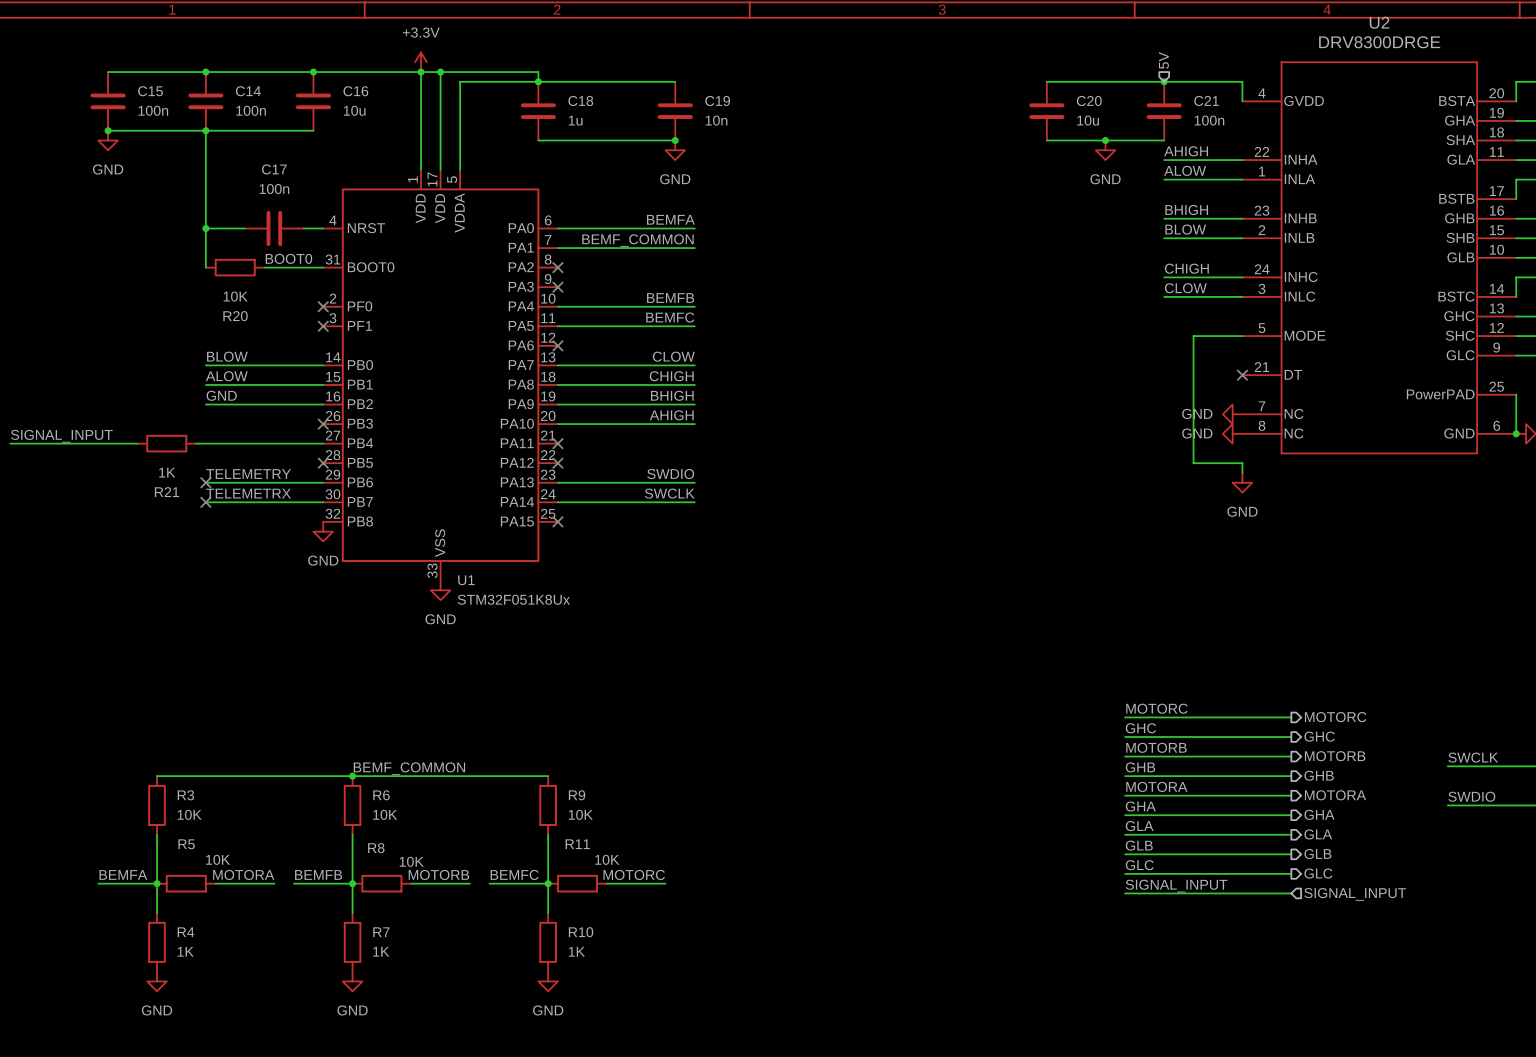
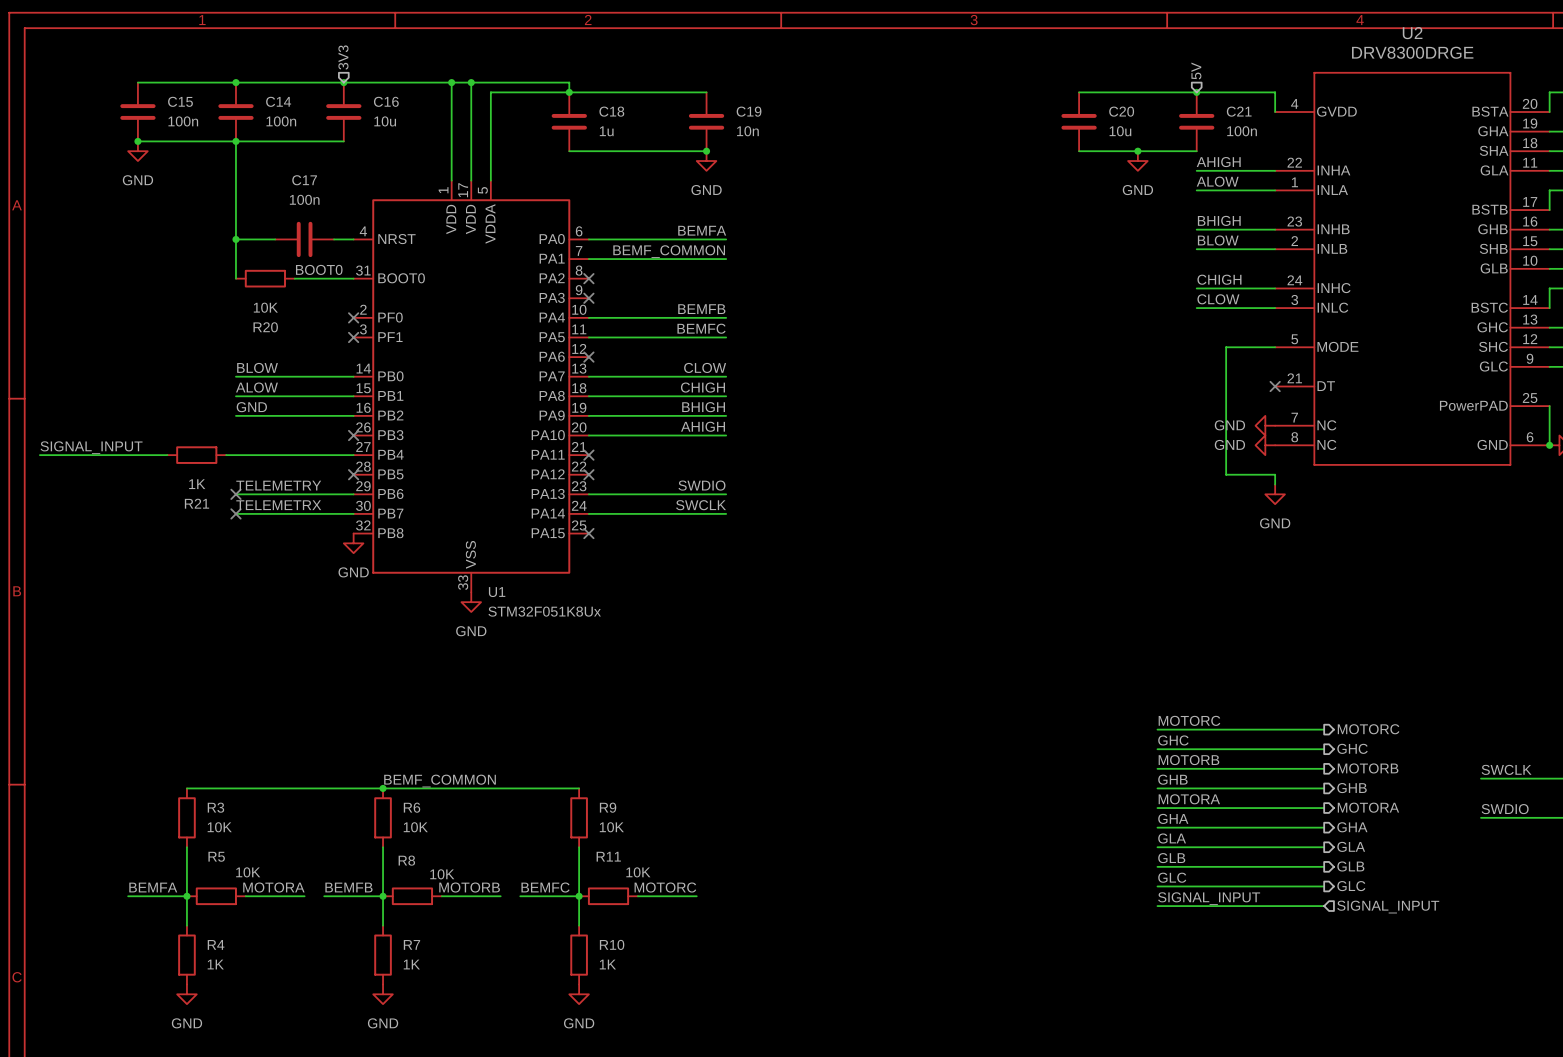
hierarchical label: none -> 3V3 (343, 57)
power symbol: +3.3V (421, 62) -> none

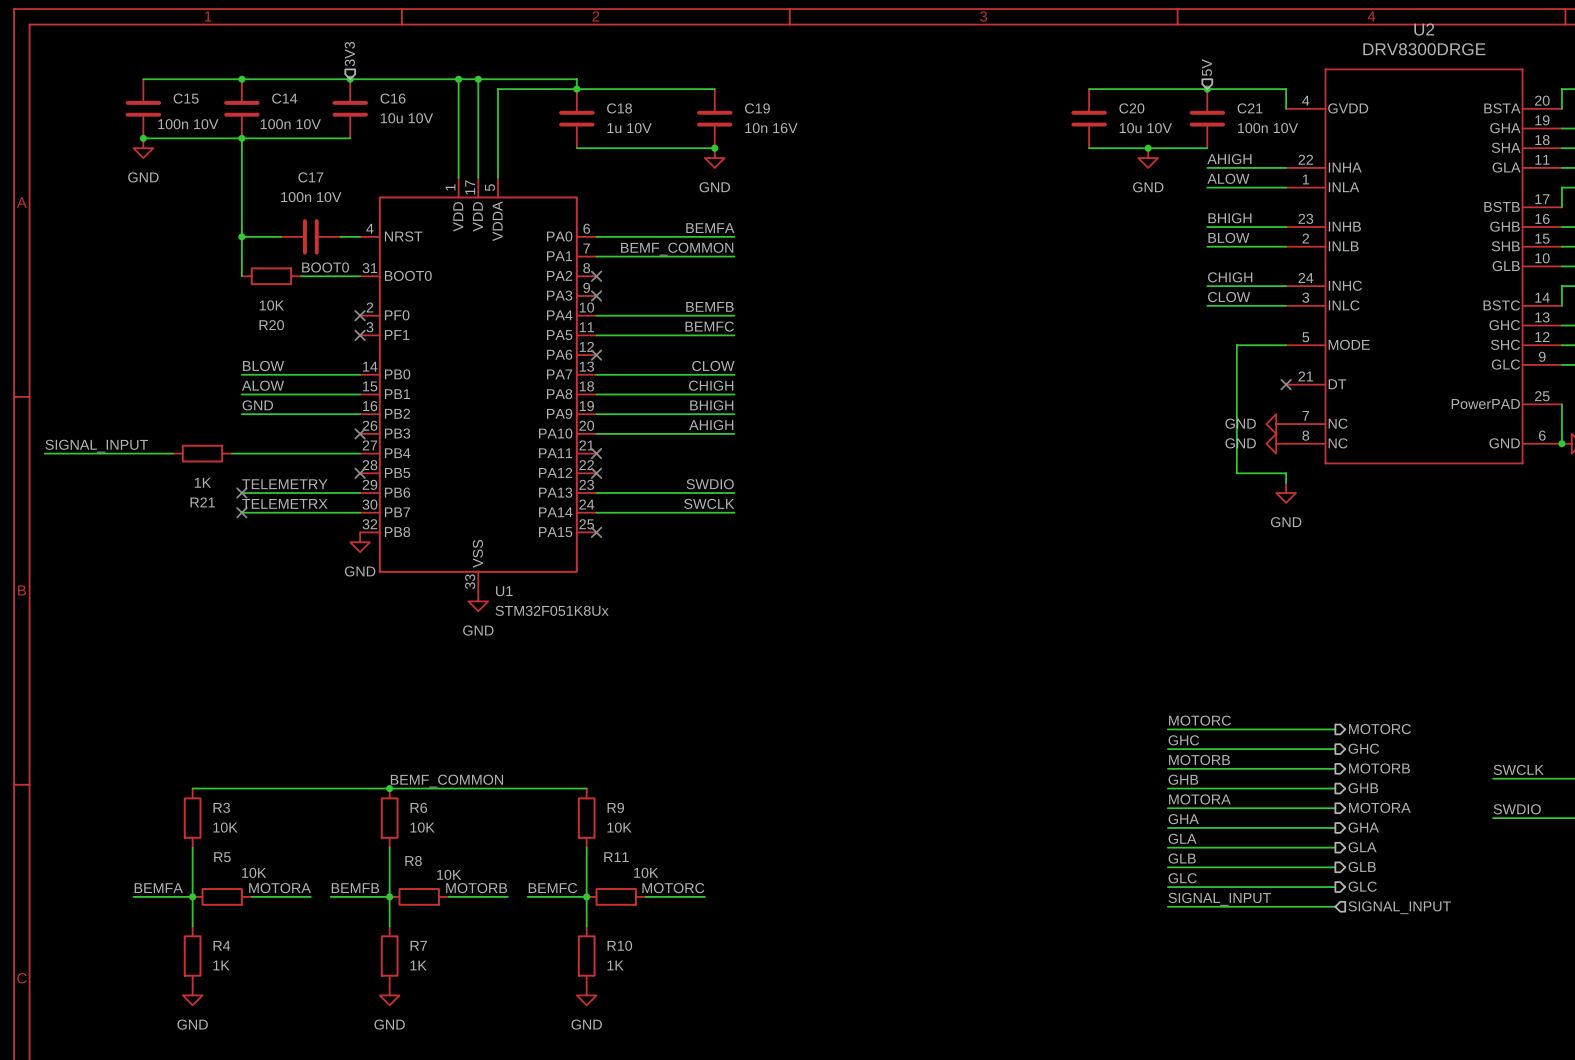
C15 value: 100n (183, 121) -> 100n 10V (188, 124)
C14 value: 100n (281, 121) -> 100n 10V (290, 124)
C16 value: 10u (385, 121) -> 10u 10V (406, 118)
C18 value: 1u (606, 131) -> 1u 10V (629, 128)
C19 value: 10n (747, 131) -> 10n 16V (771, 128)
C20 value: 10u (1120, 131) -> 10u 10V (1145, 128)
C21 value: 100n (1242, 131) -> 100n 10V (1268, 128)
C17 value: 100n (304, 199) -> 100n 10V (311, 197)

